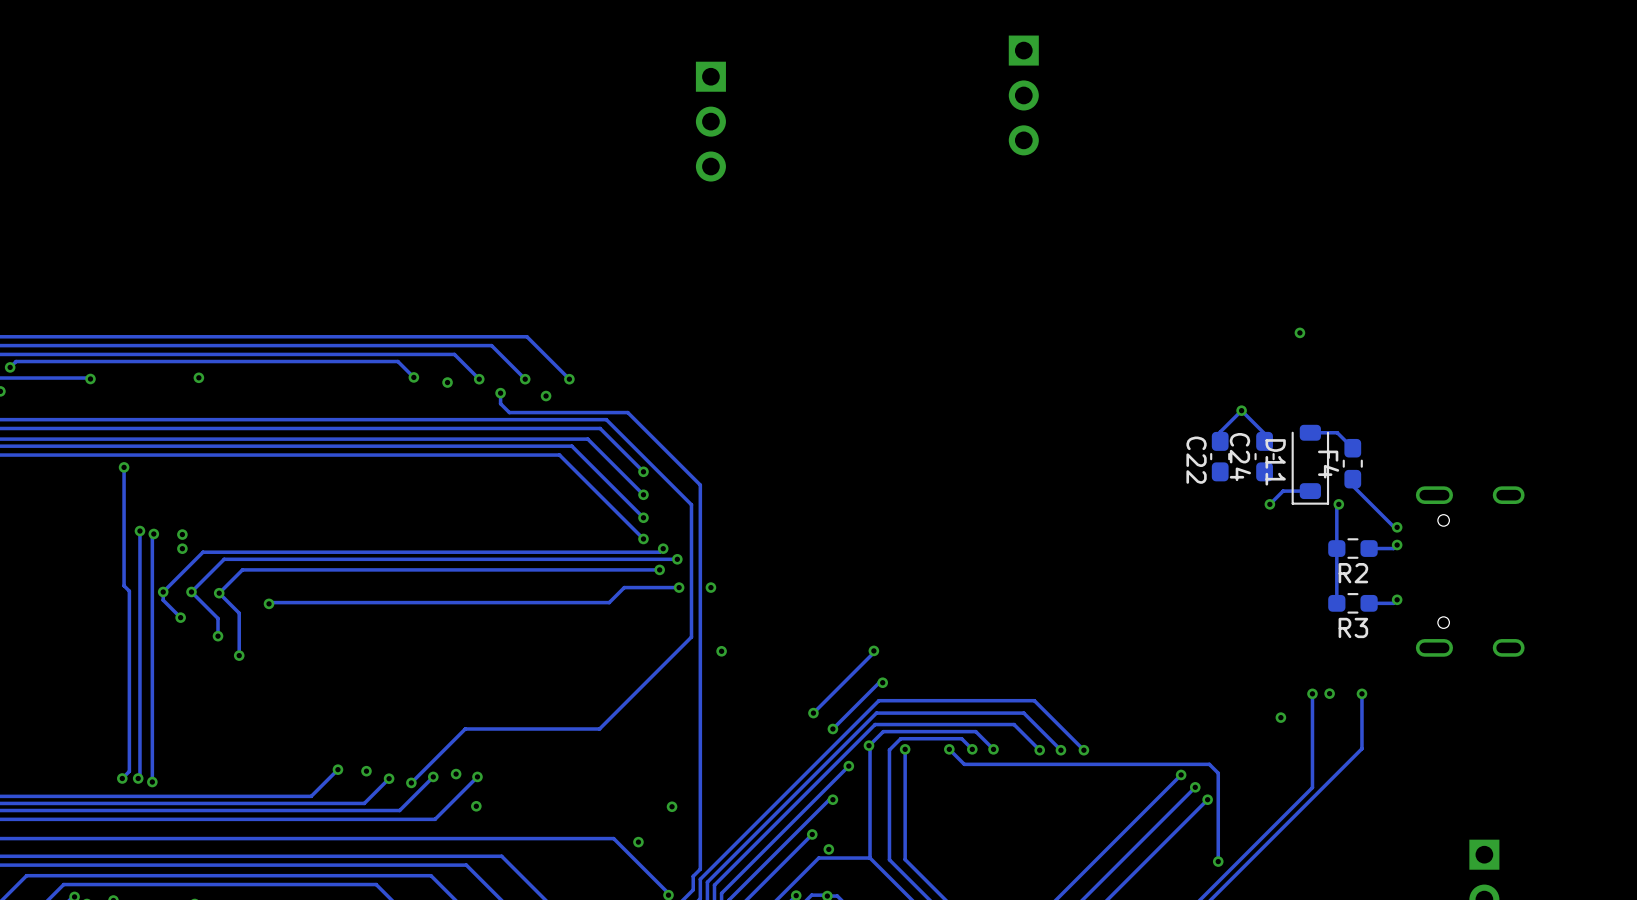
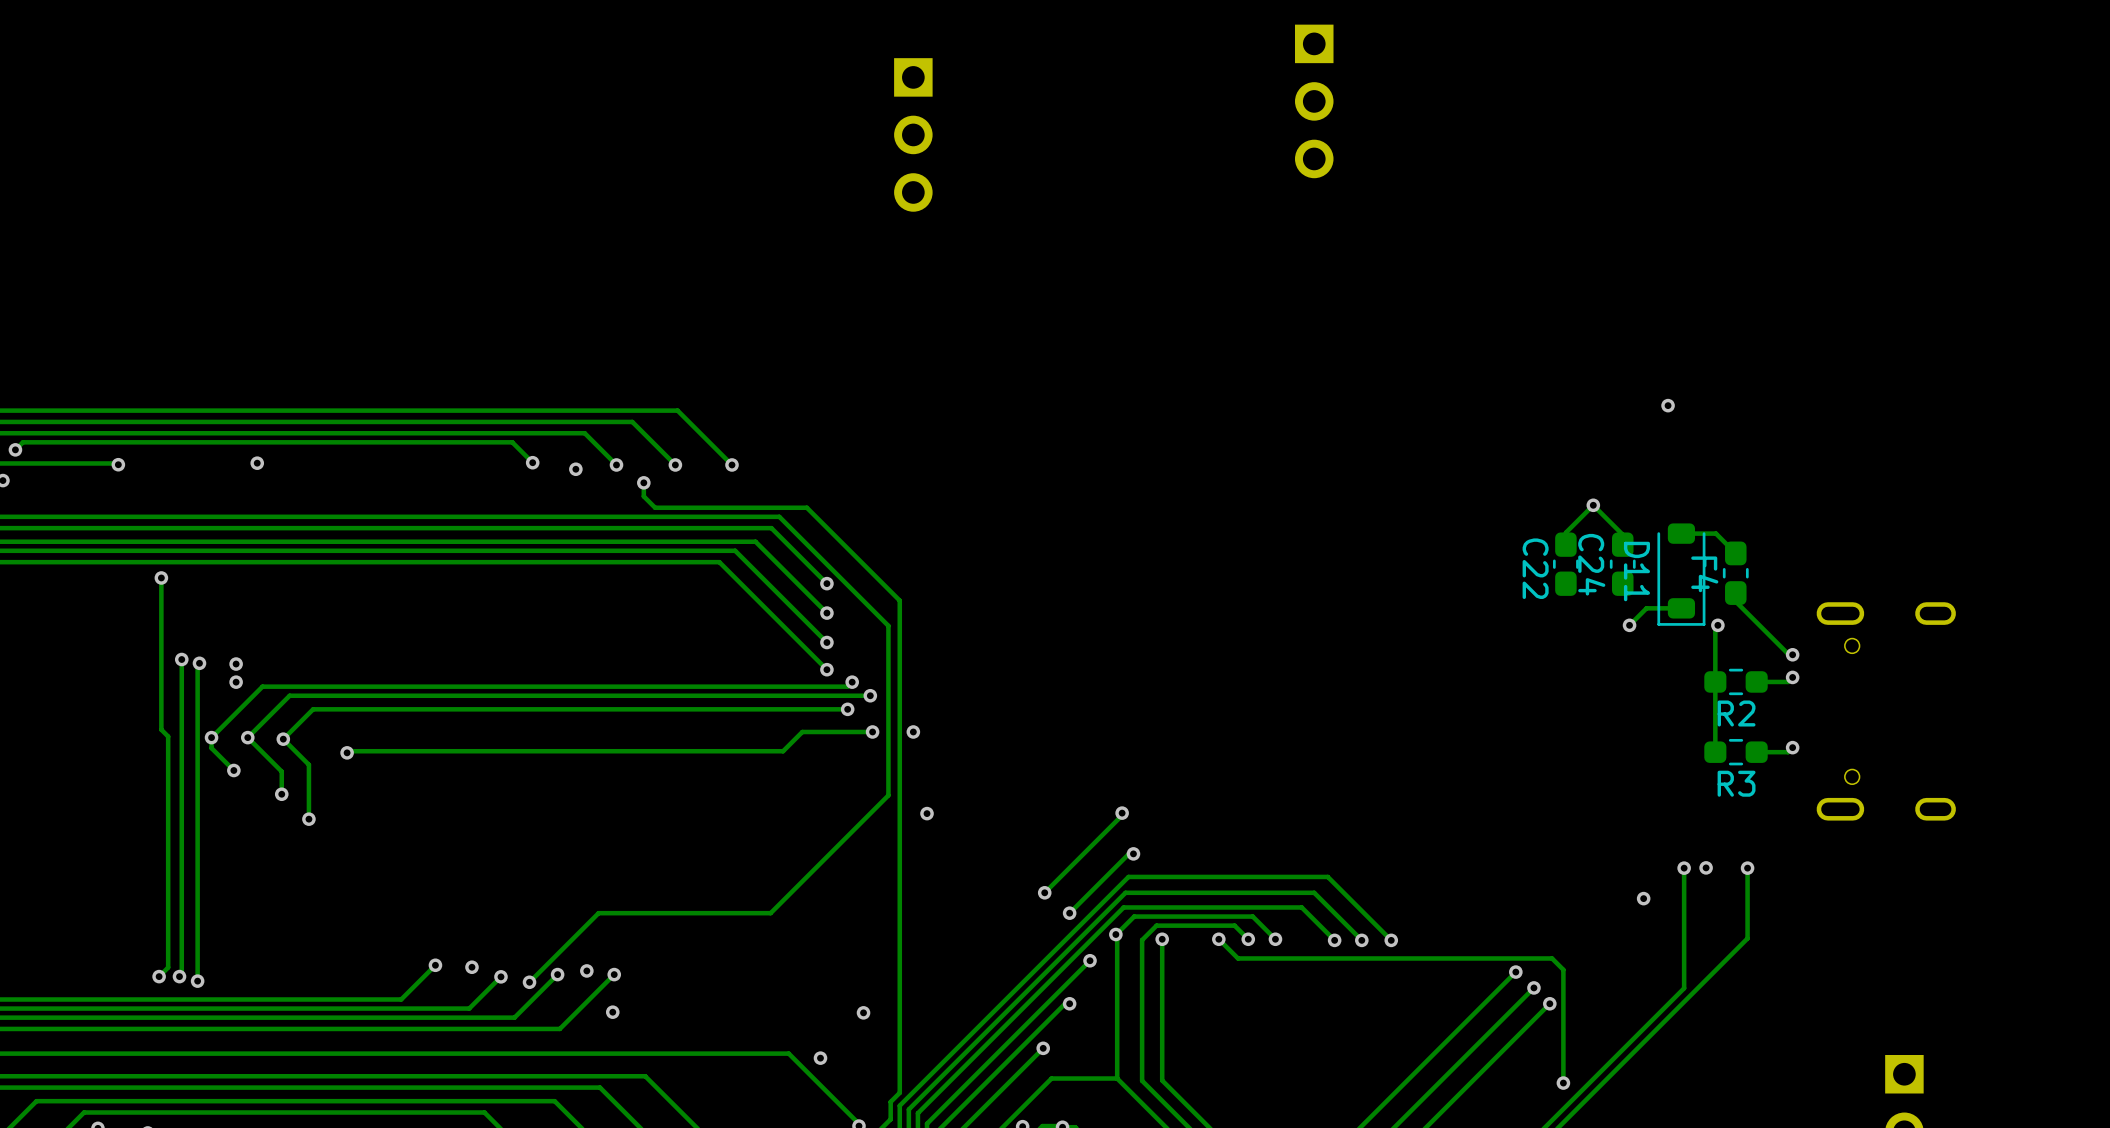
via: (546, 396) -> none
via: (828, 849) -> none

